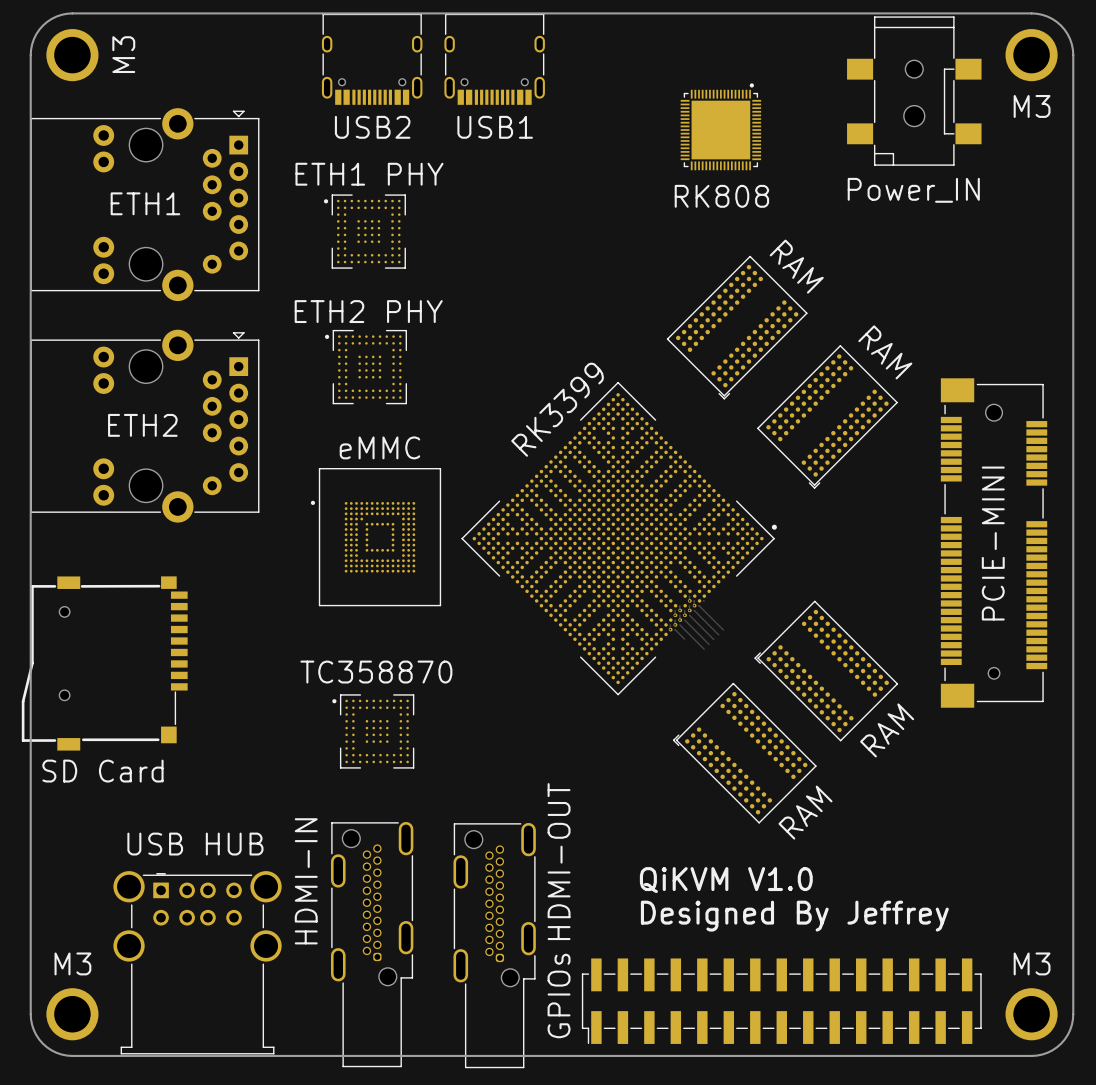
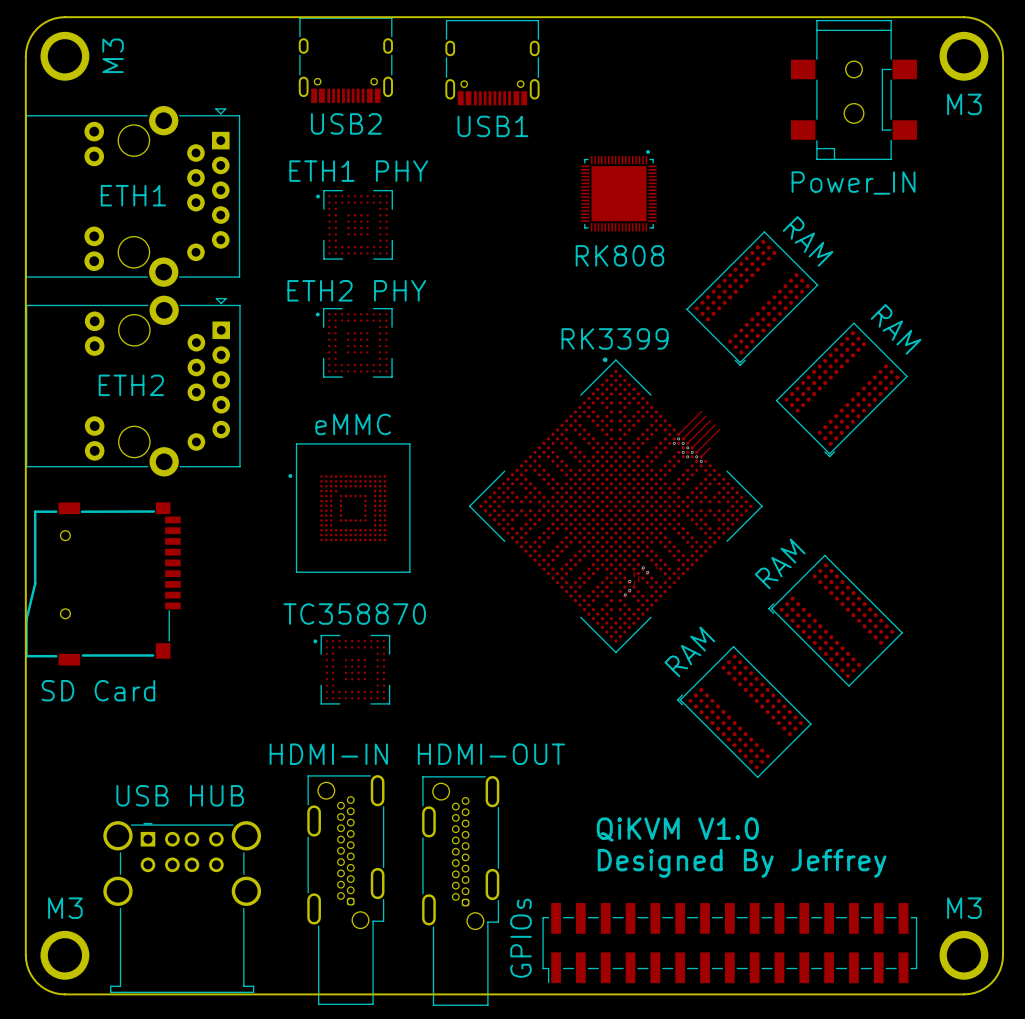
USB1 position: (494, 59) -> (492, 62)
RK808 position: (720, 126) -> (619, 190)
ETH1 PHY position: (364, 231) -> (354, 224)
RAM: none -> (752, 298)
RAM: (737, 327) -> none
ETH2 PHY position: (365, 367) -> (354, 342)
RK3399 name position: RK3399 (557, 409) -> RK3399 (615, 338)
RAM: none -> (841, 389)
RAM: (827, 416) -> none
ETH2 position: (144, 426) -> (133, 386)
track: none -> (701, 411) (678, 434)
track: none -> (706, 415) (683, 438)
track: none -> (710, 420) (687, 443)
track: none -> (715, 424) (692, 447)
track: none -> (719, 429) (696, 452)
via: none -> (678, 438)
via: none -> (674, 443)
via: none -> (683, 443)
via: none -> (687, 447)
track: none -> (710, 447) (701, 456)
via: none -> (683, 452)
via: none -> (692, 452)
via: none -> (687, 456)
via: none -> (696, 456)
via: none -> (701, 461)
RK3399 rotation: 0° (619, 538) -> 90° counterclockwise (615, 505)
PCIE-MINI: (994, 543) -> none
track: (689, 596) (689, 600) -> none
track: (694, 601) (694, 605) -> none
track: (689, 605) (689, 610) -> none
track: (699, 605) (723, 629) -> none
via: (679, 610) -> none
via: (689, 610) -> none
track: (694, 610) (718, 634) -> none
via: (684, 615) -> none
track: (689, 615) (713, 639) -> none
via: (679, 620) -> none
track: (684, 620) (709, 644) -> none
track: (670, 624) (670, 629) -> none
track: (679, 624) (704, 649) -> none
track: (675, 629) (684, 639) -> none
RAM: none -> (835, 620)
SD Card position: (104, 663) -> (102, 583)
RAM: (826, 671) -> none
TC358870 position: (373, 731) -> (351, 669)
RAM: (744, 753) -> none
RAM: none -> (744, 712)
SD Card name position: SD Card (102, 771) -> SD Card (98, 690)
HDMI-OUT name rotation: 0° (559, 861) -> 90° clockwise (491, 754)
HDMI-IN name rotation: 0° (306, 881) -> 90° clockwise (328, 754)

